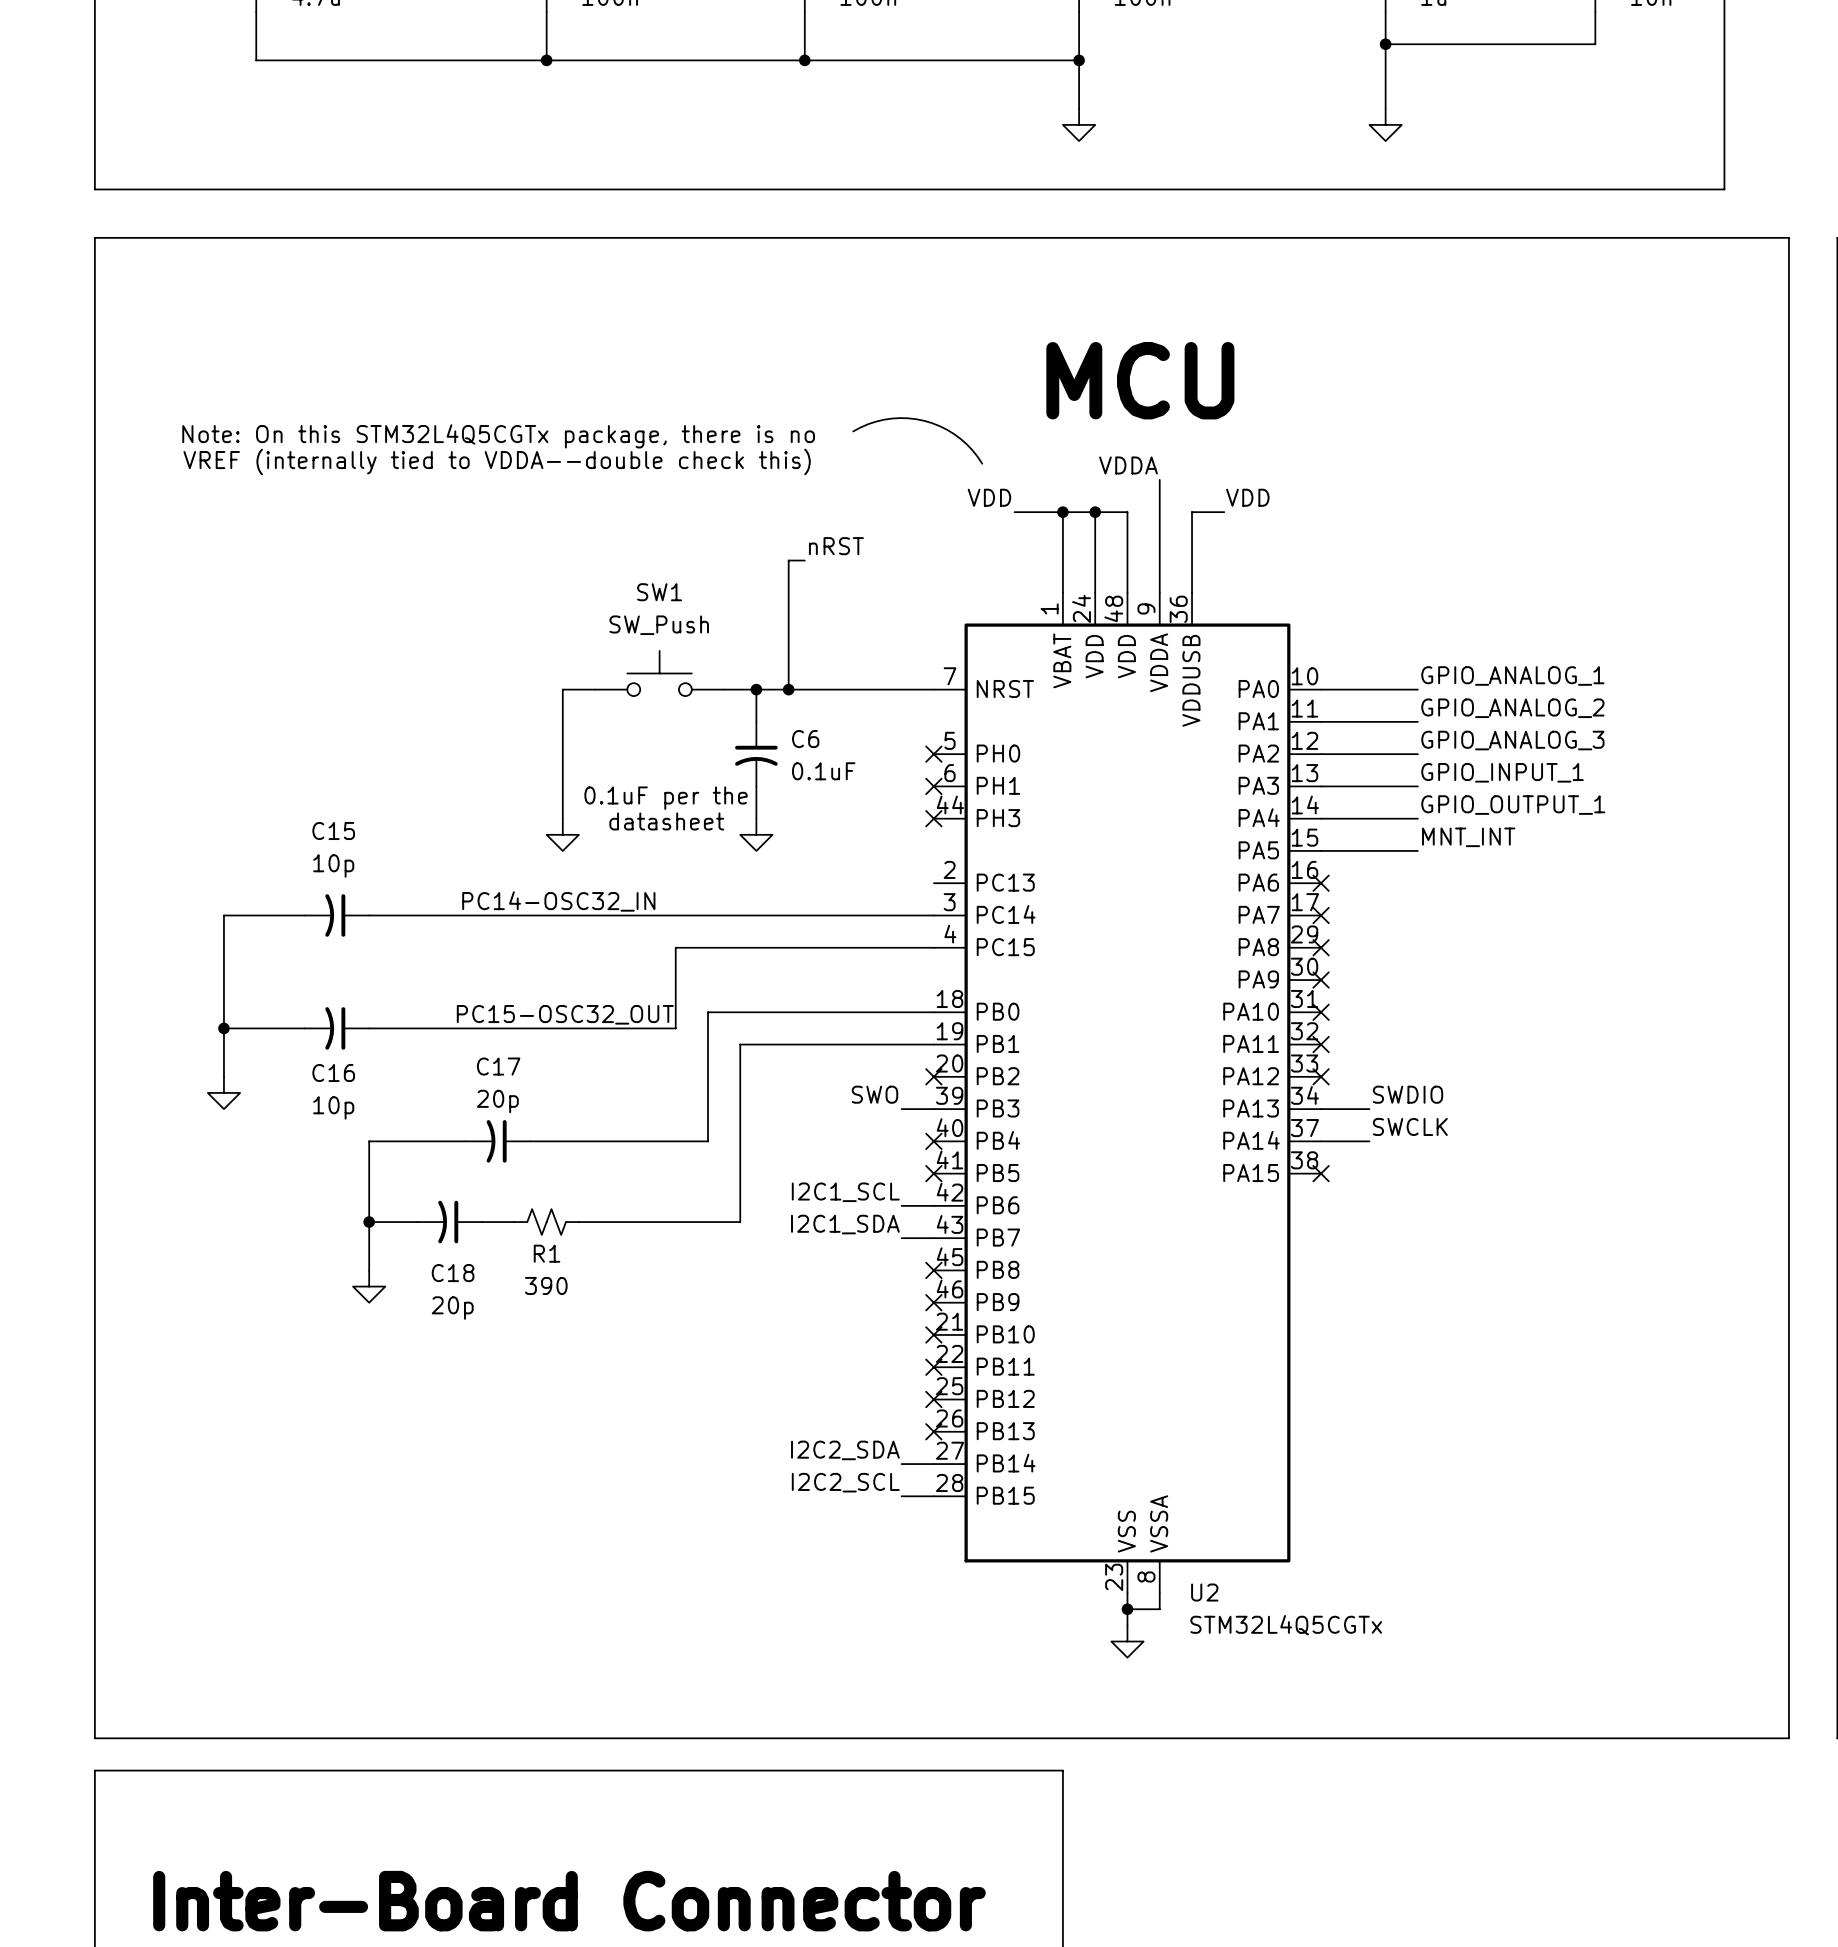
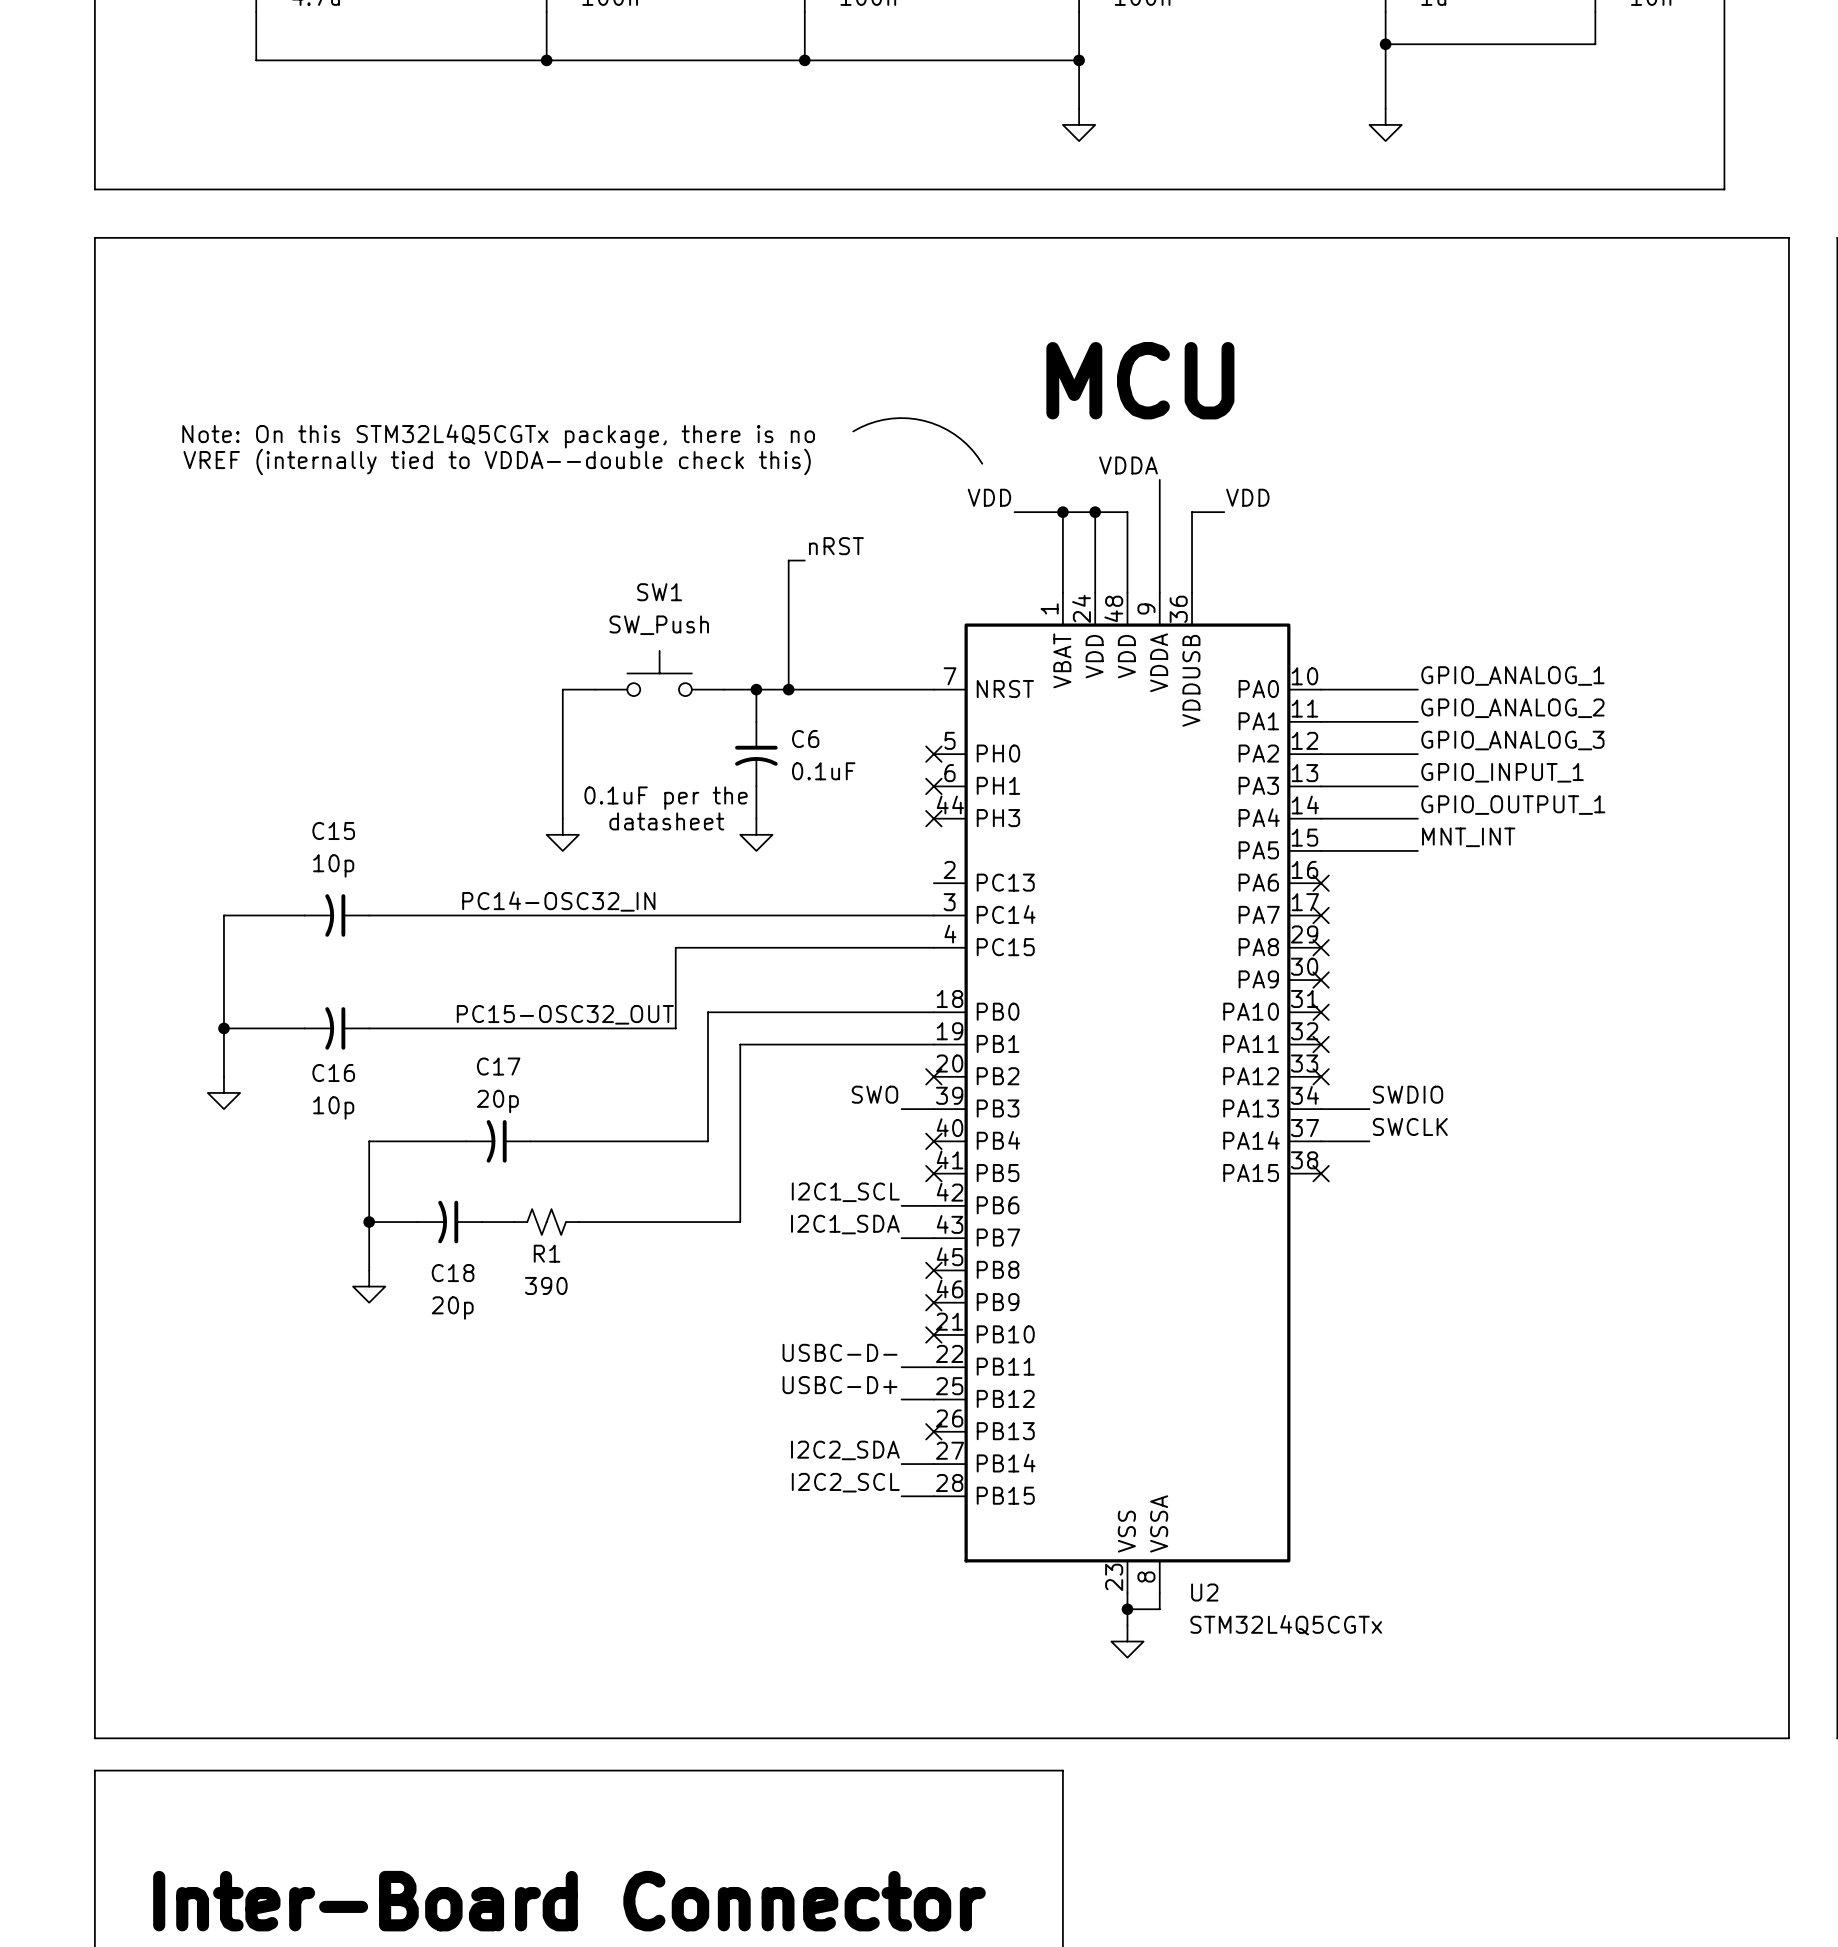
label: none -> USBC-D- (840, 1352)
wire: none -> (901, 1367) (933, 1367)
no-connect mark: (933, 1367) -> none
label: none -> USBC-D+ (840, 1385)
wire: none -> (901, 1399) (933, 1399)
no-connect mark: (933, 1399) -> none

